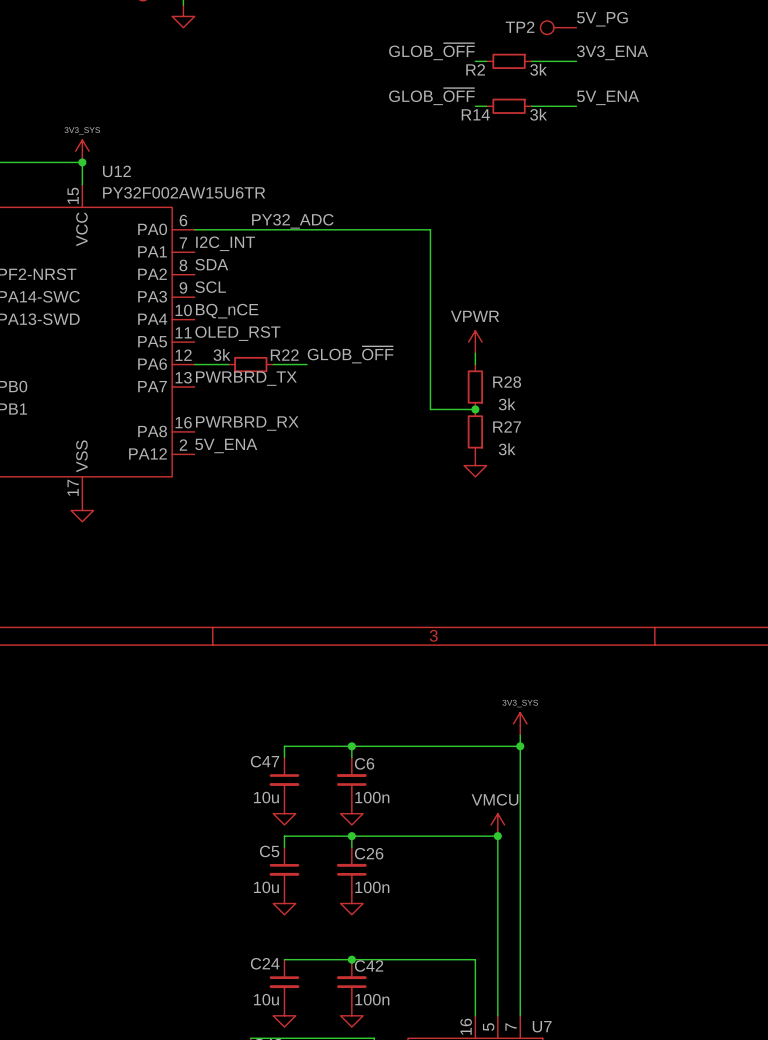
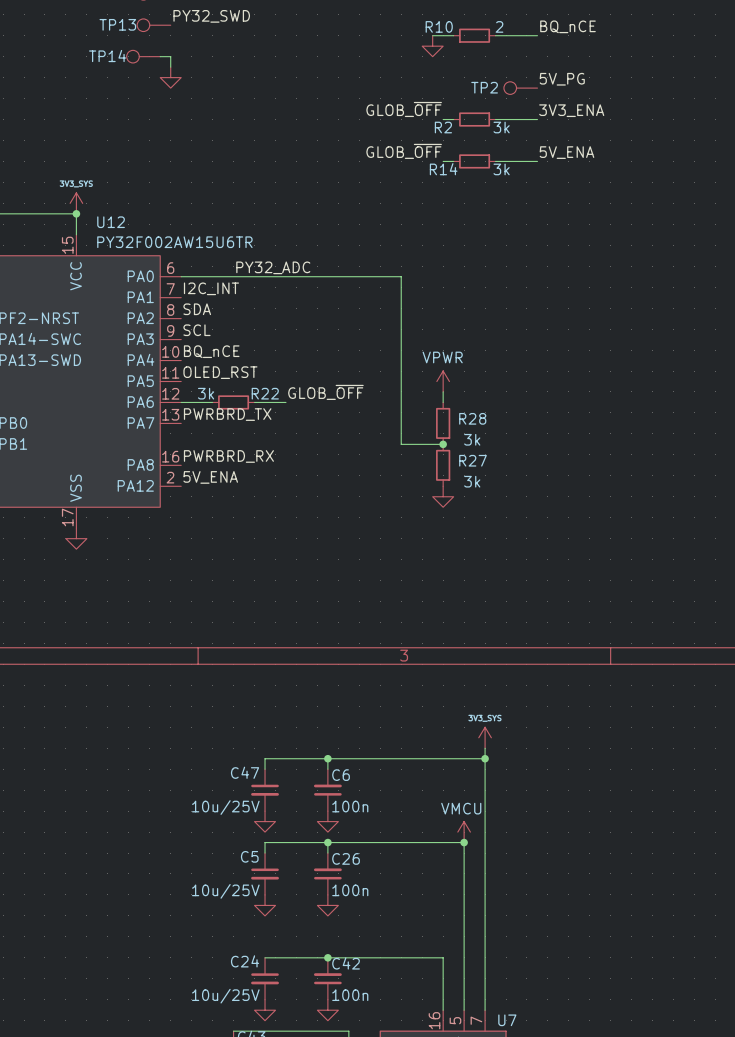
C47 value: 10u (266, 797) -> 10u/25V (225, 807)
C5 value: 10u (266, 887) -> 10u/25V (225, 891)
C24 value: 10u (266, 999) -> 10u/25V (225, 996)

